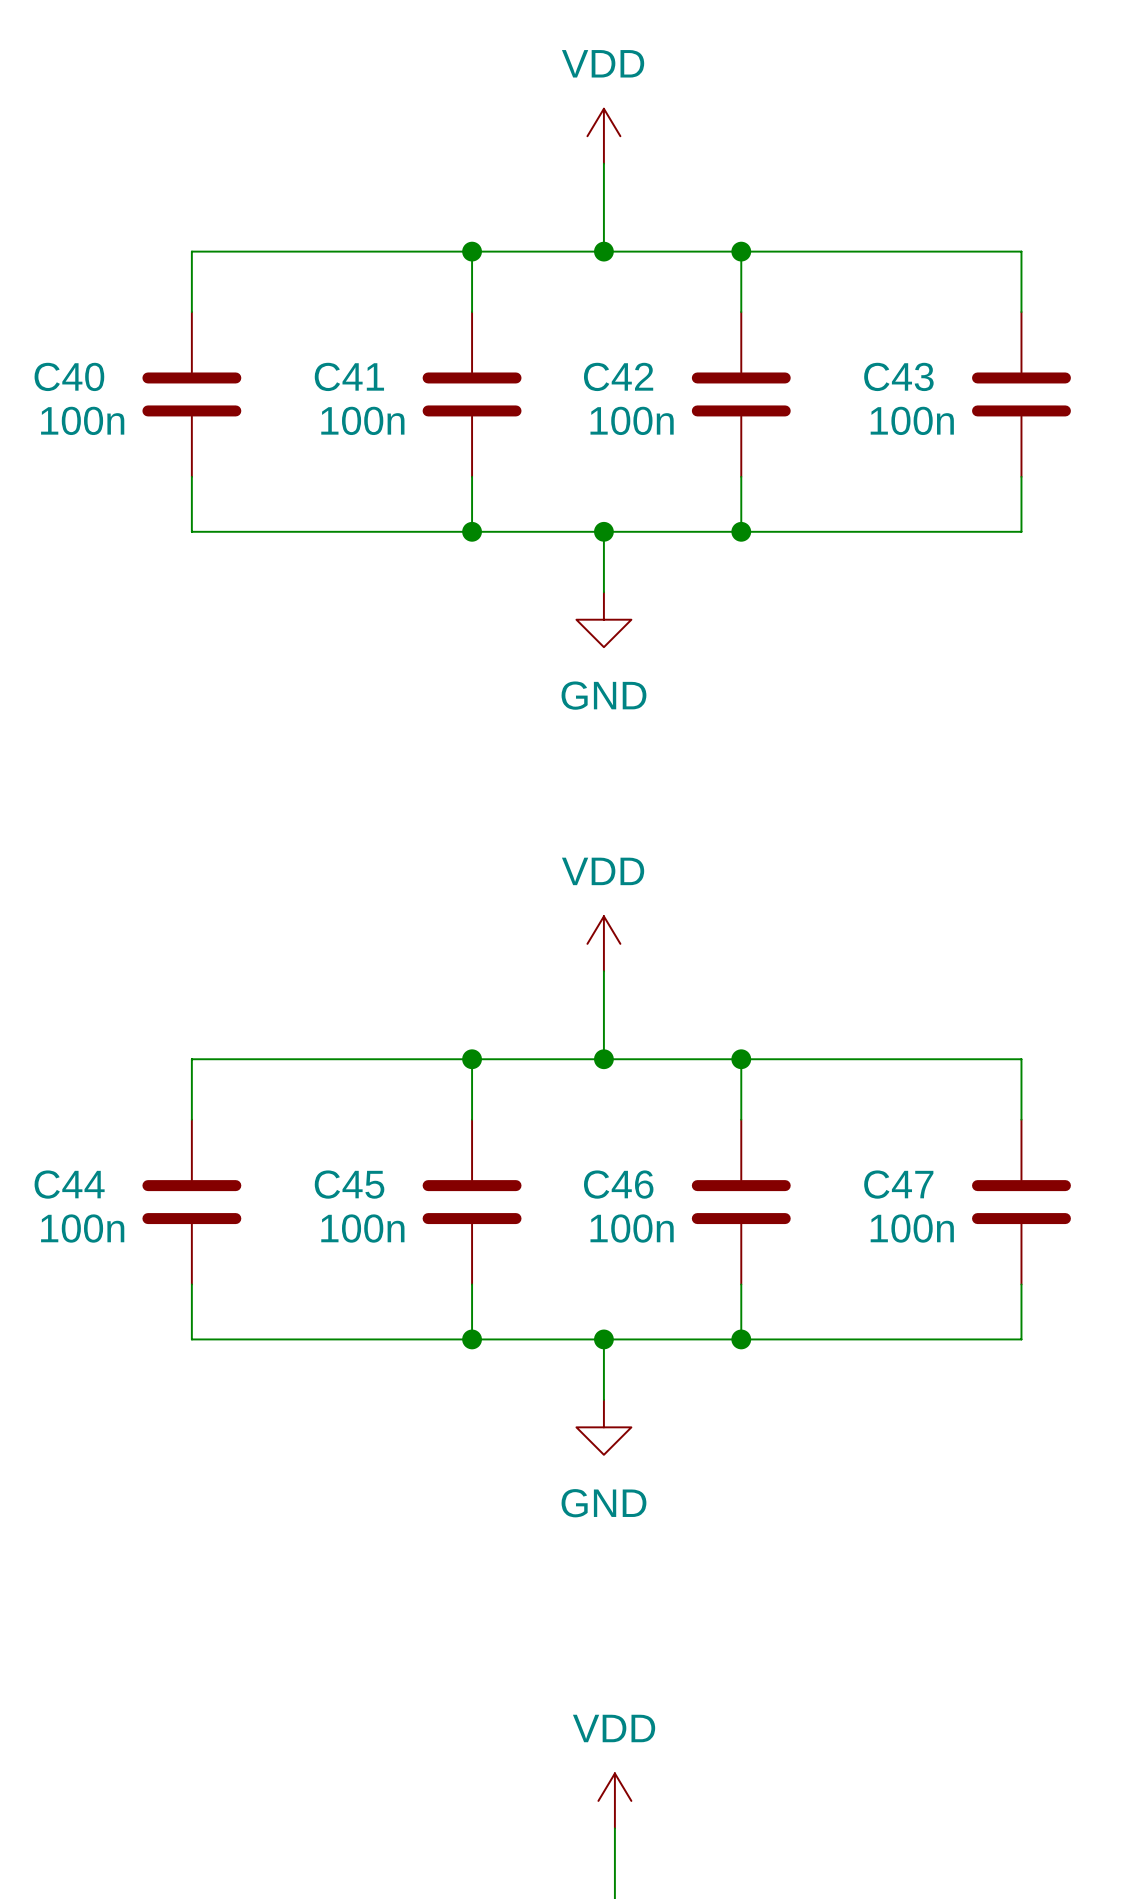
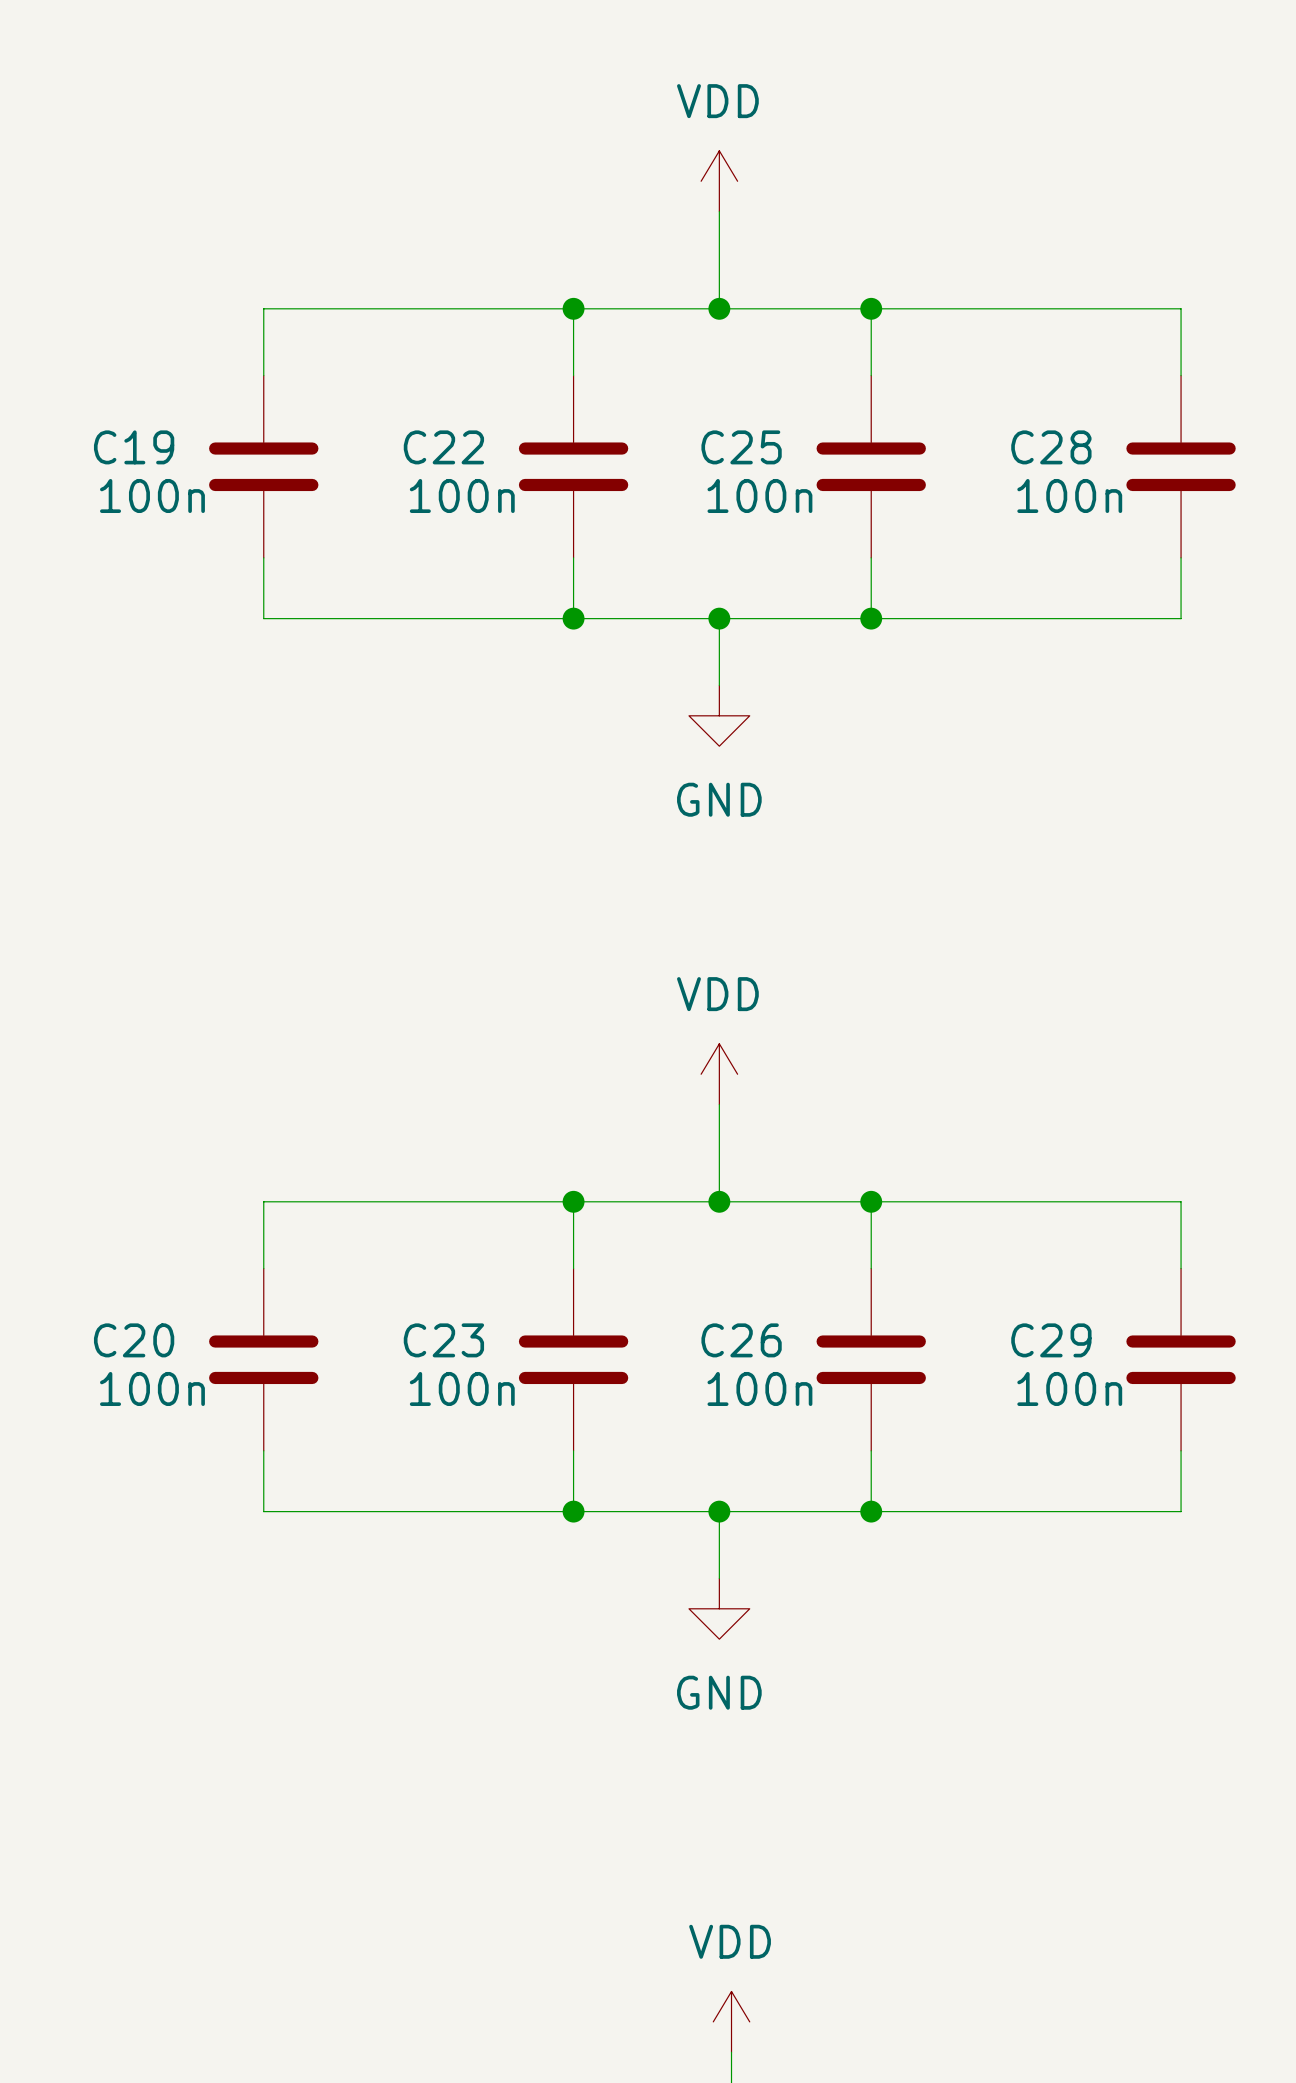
C40 name: C40 (69, 376) -> C19 (134, 447)
C41 name: C41 (349, 376) -> C22 (443, 447)
C42 name: C42 (618, 376) -> C25 (741, 447)
C43 name: C43 (898, 376) -> C28 (1051, 447)
C44 name: C44 (69, 1184) -> C20 (134, 1340)
C45 name: C45 (349, 1184) -> C23 (443, 1340)
C46 name: C46 (618, 1184) -> C26 (741, 1340)
C47 name: C47 (898, 1184) -> C29 (1051, 1340)

